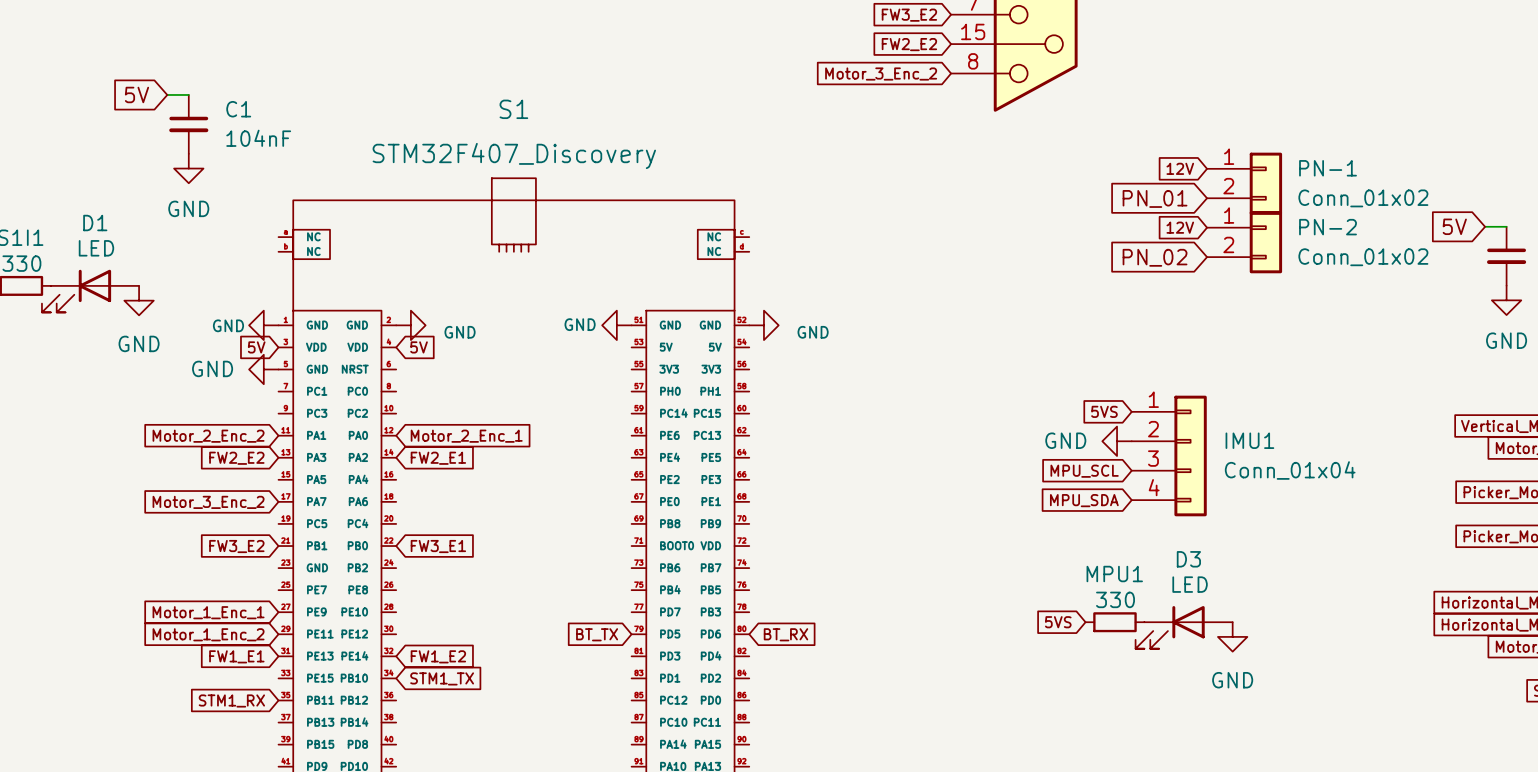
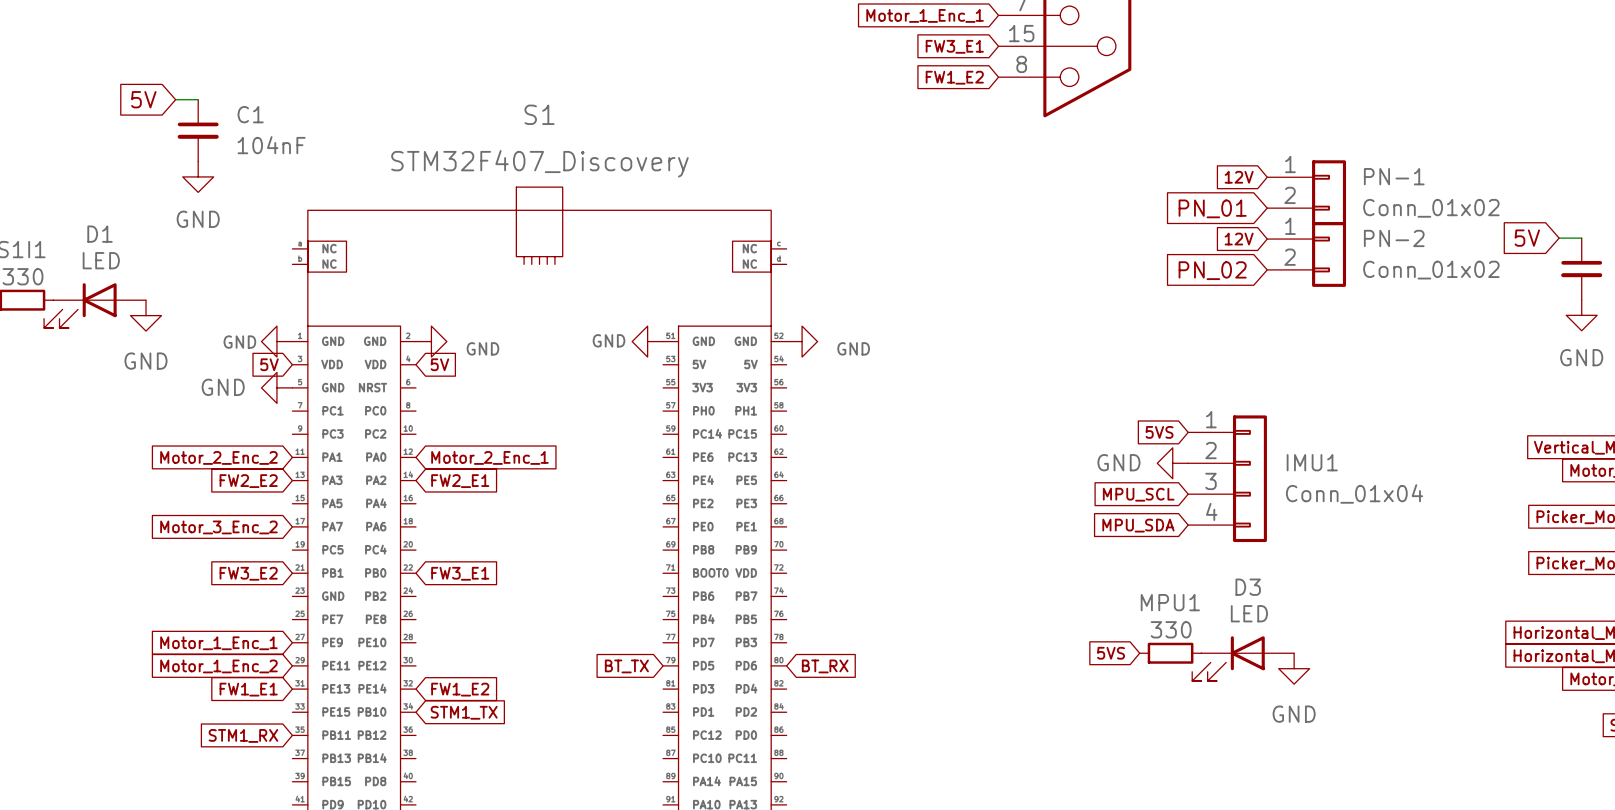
global label: FW3_E2 (909, 15) -> Motor_1_Enc_1 (925, 15)
global label: FW2_E2 (909, 44) -> FW3_E1 (954, 46)
global label: Motor_3_Enc_2 (881, 74) -> FW1_E2 (954, 77)

